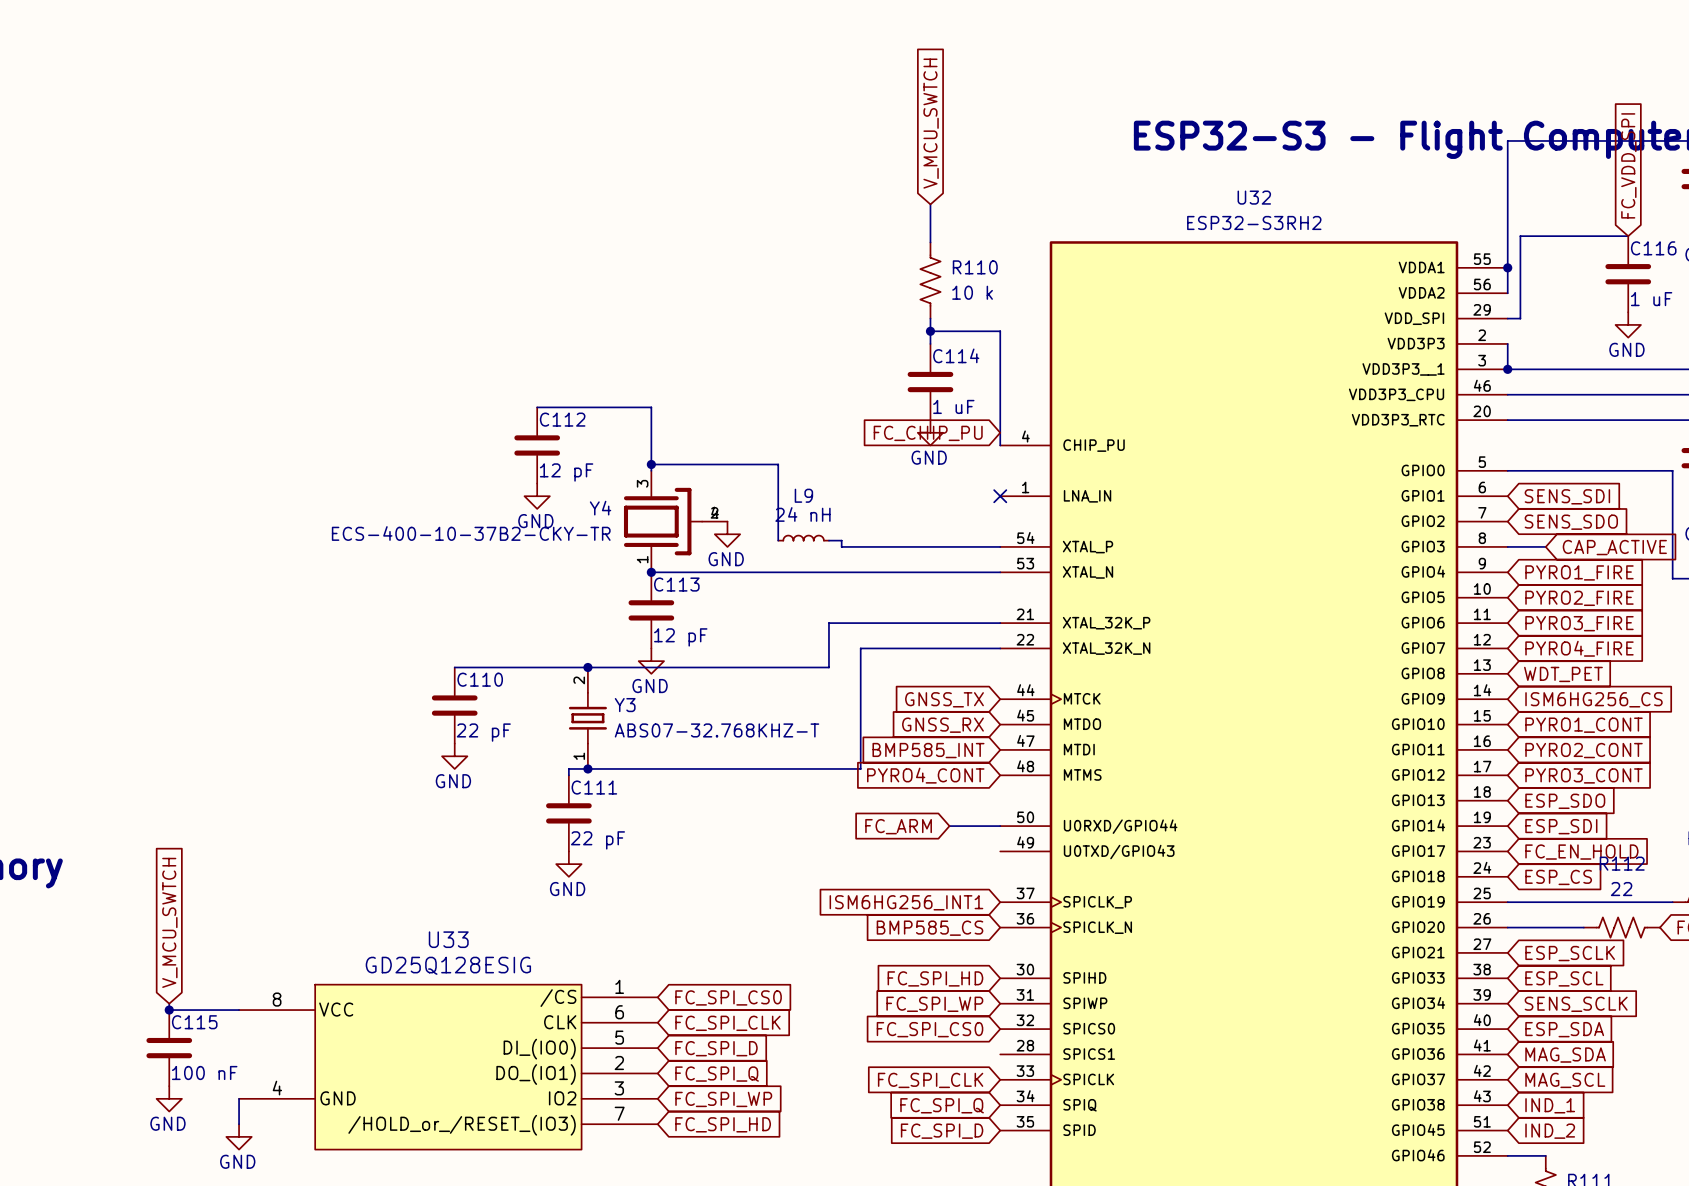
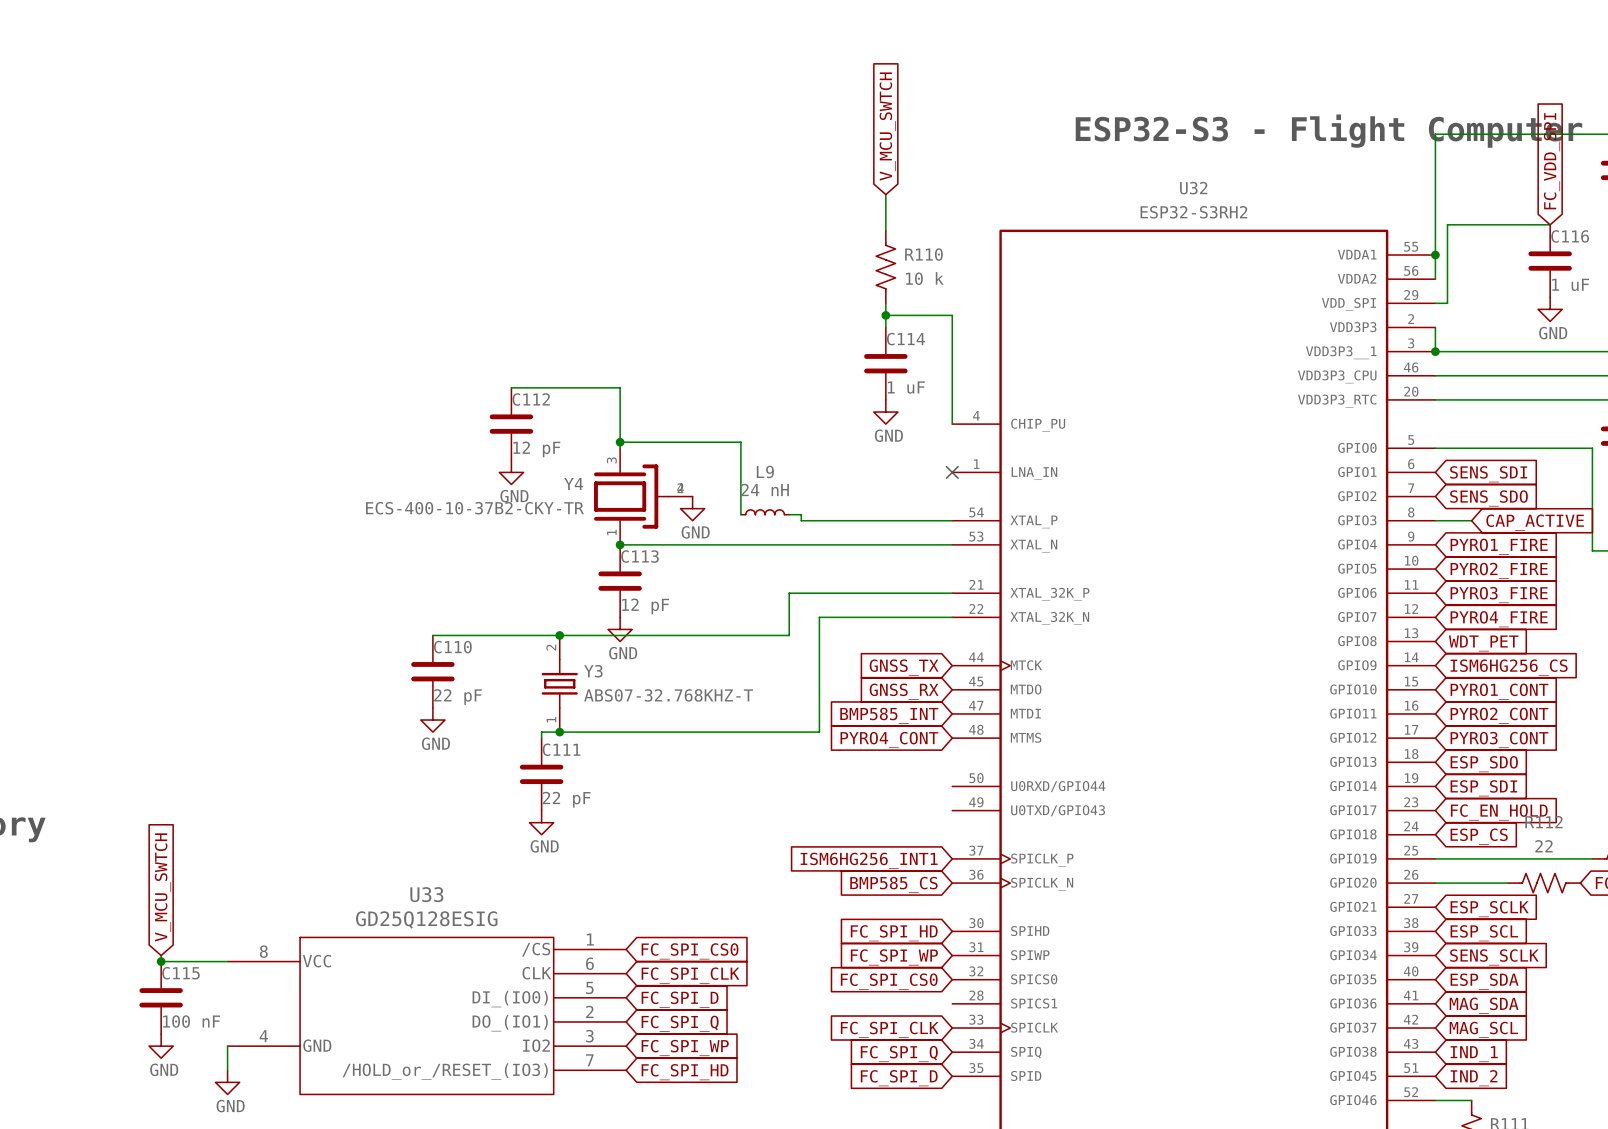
global label: FC_CHIP_PU (928, 433) -> none
global label: FC_ARM (898, 826) -> none
wire: (949, 826) (1000, 826) -> none

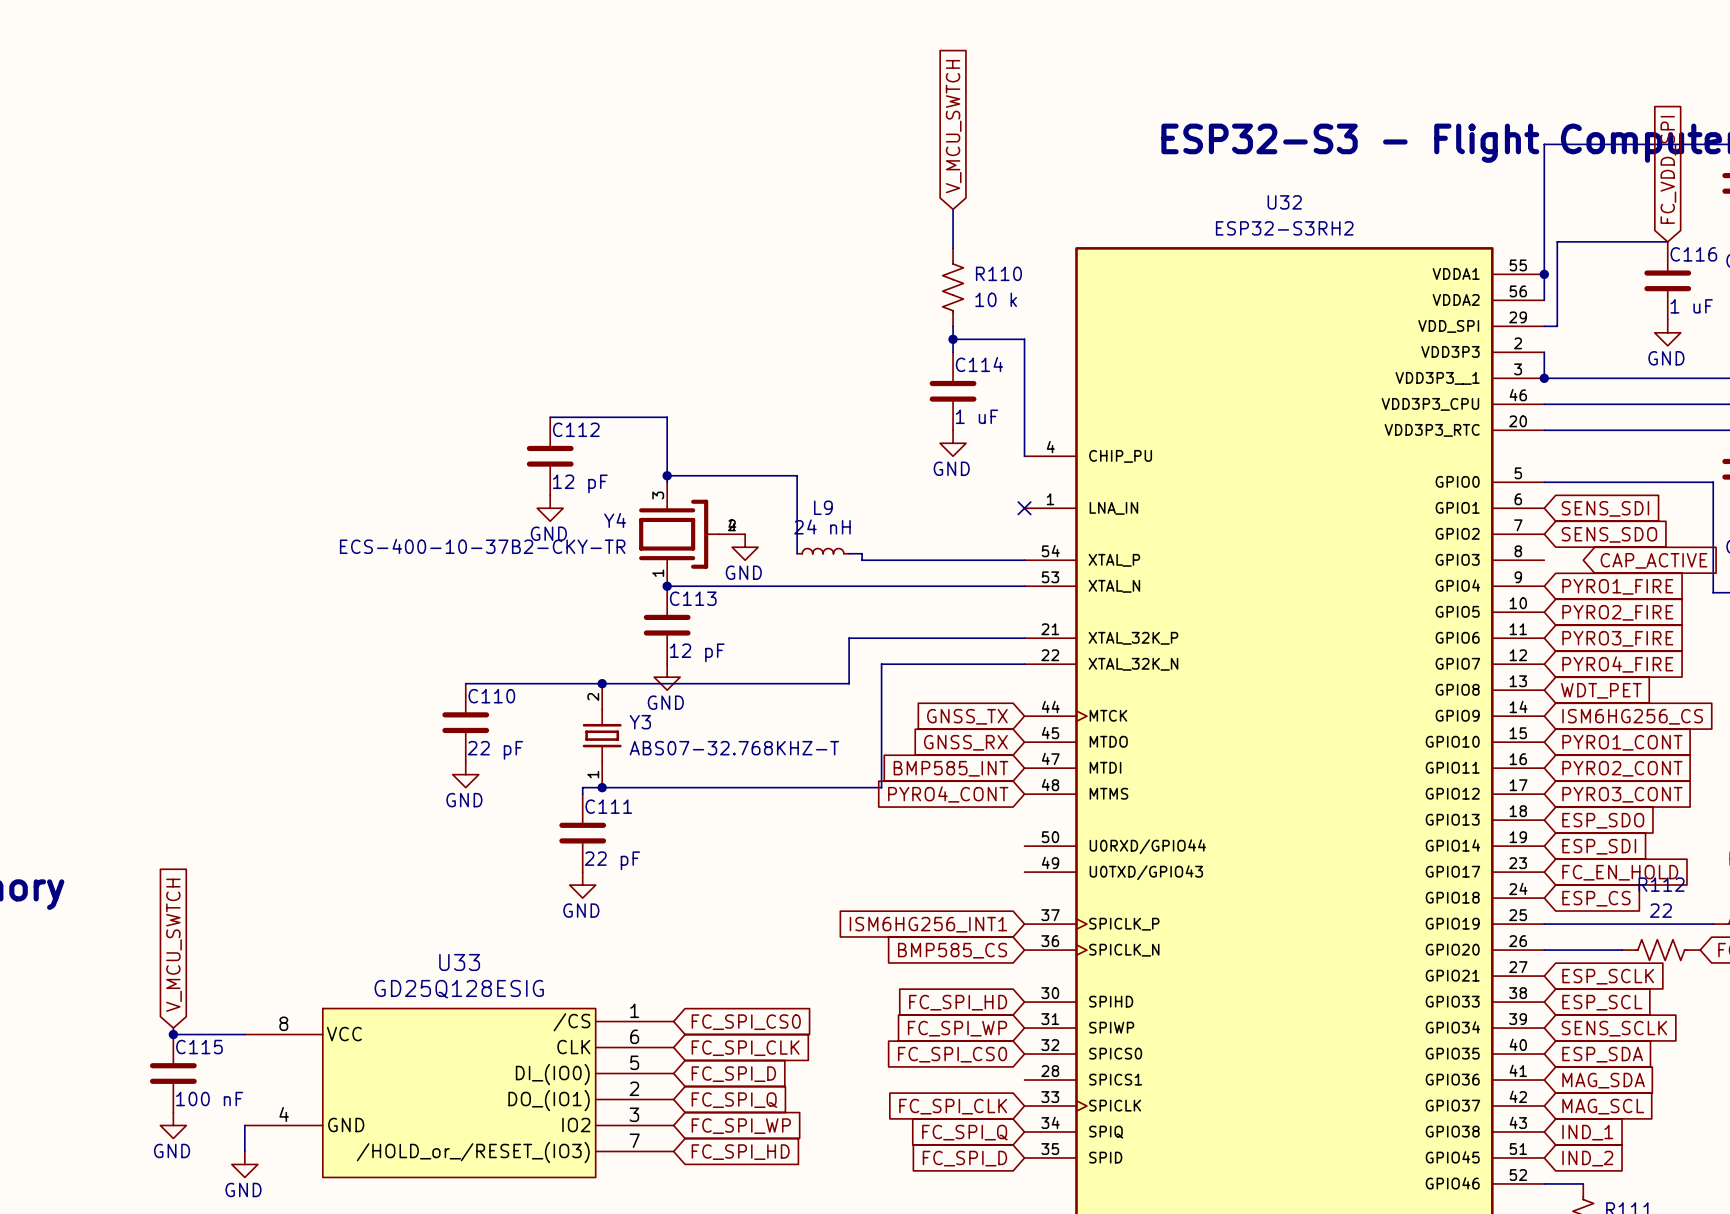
wire: (1435, 520) (1471, 520) -> none

